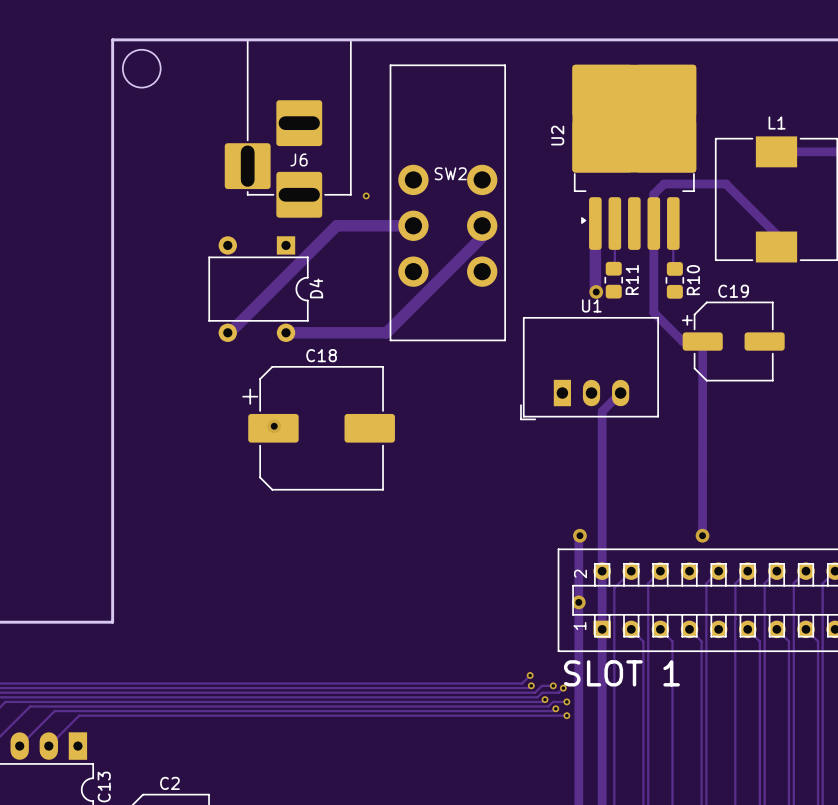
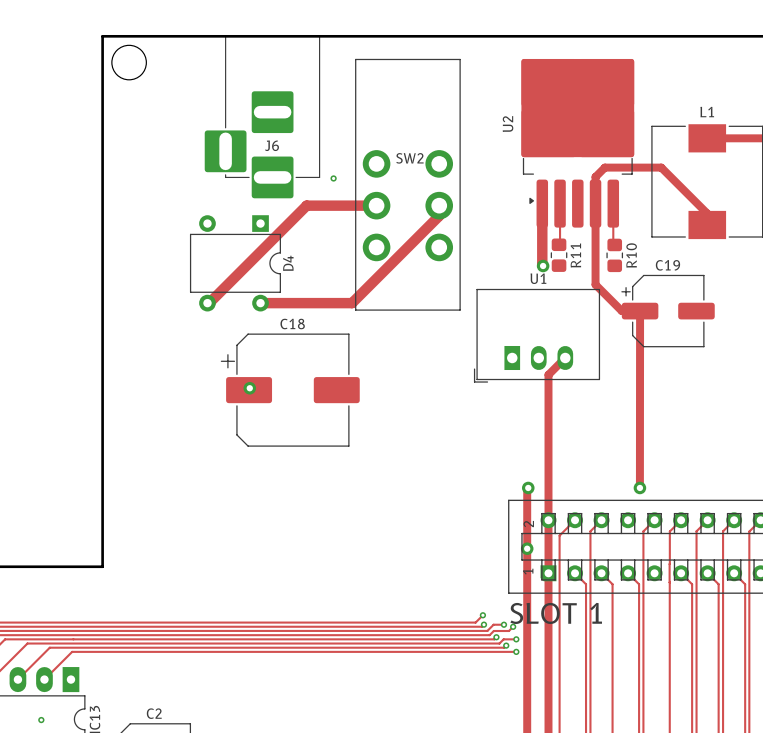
via: none -> (41, 720)

